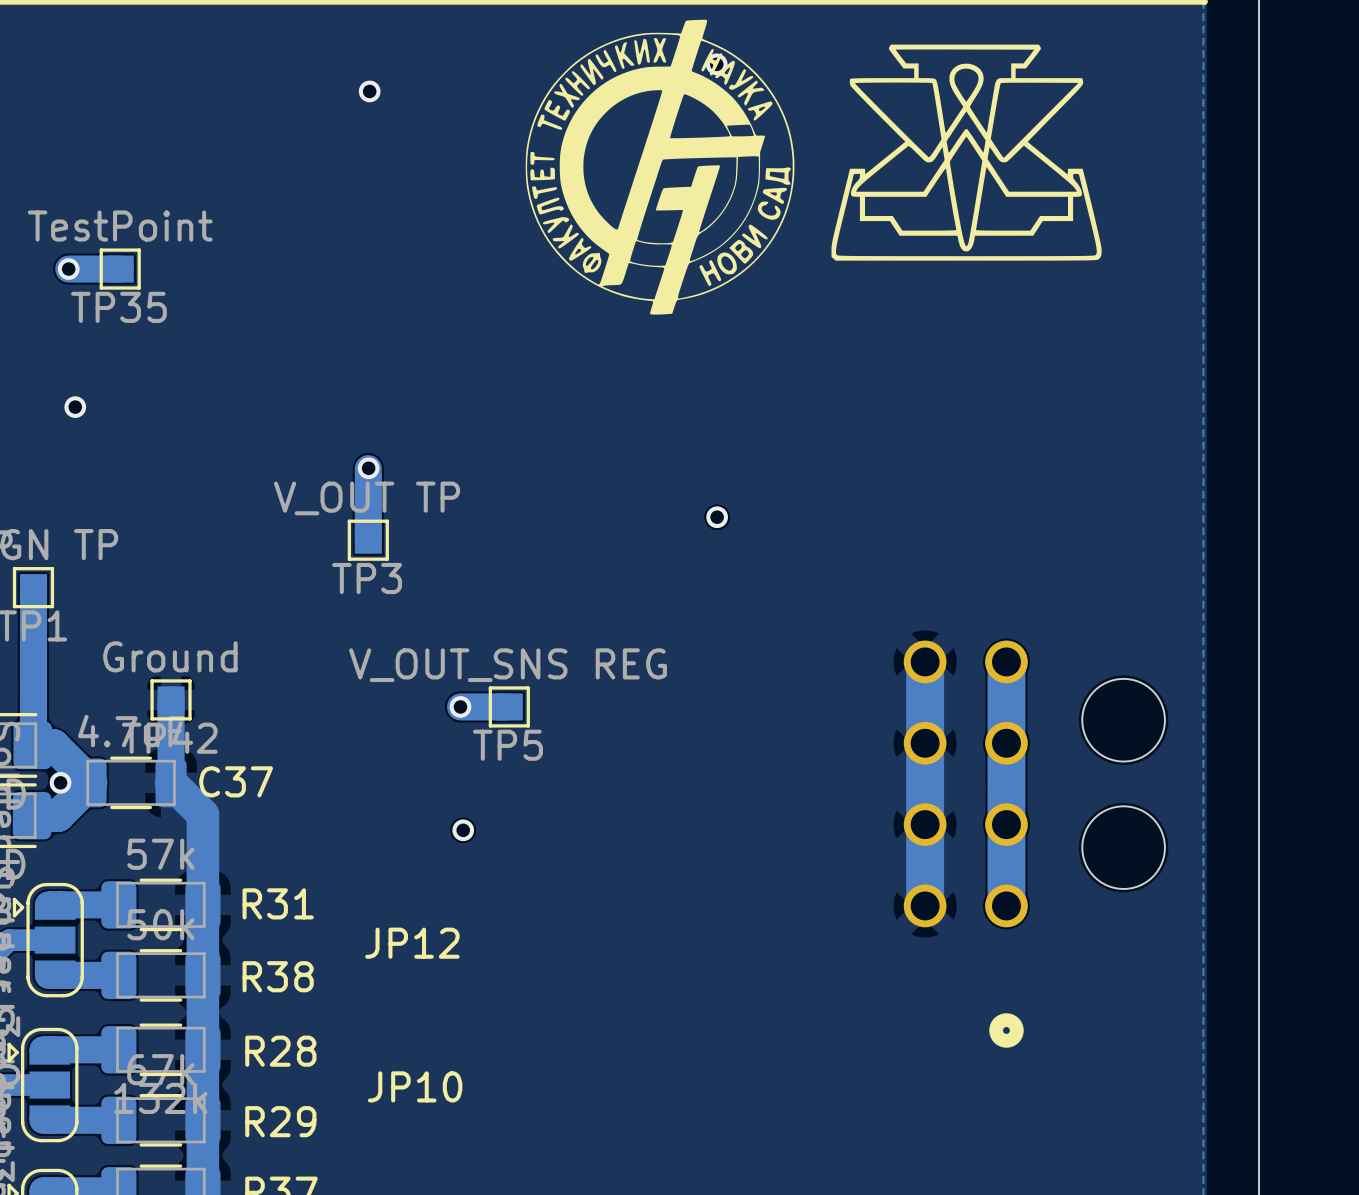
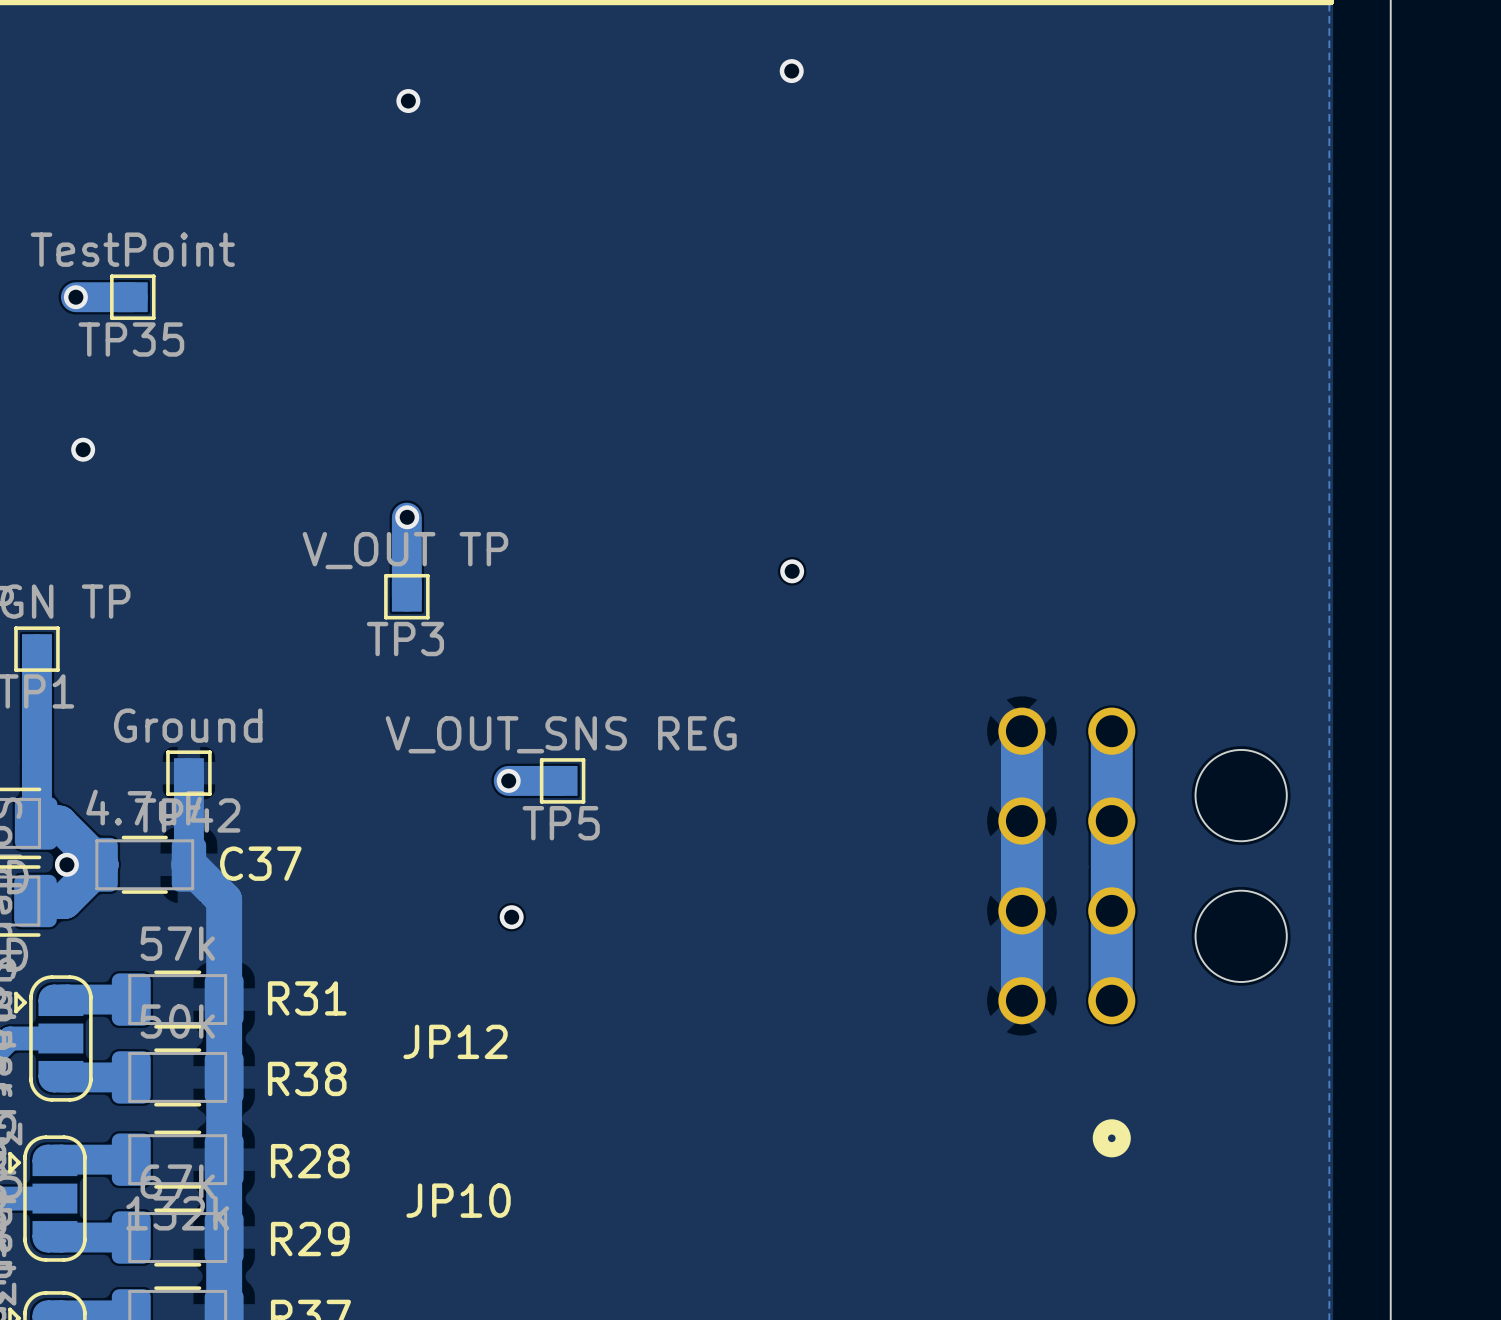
drawing: [525, 19, 795, 315] -> none
drawing: [831, 44, 1102, 261] -> none

